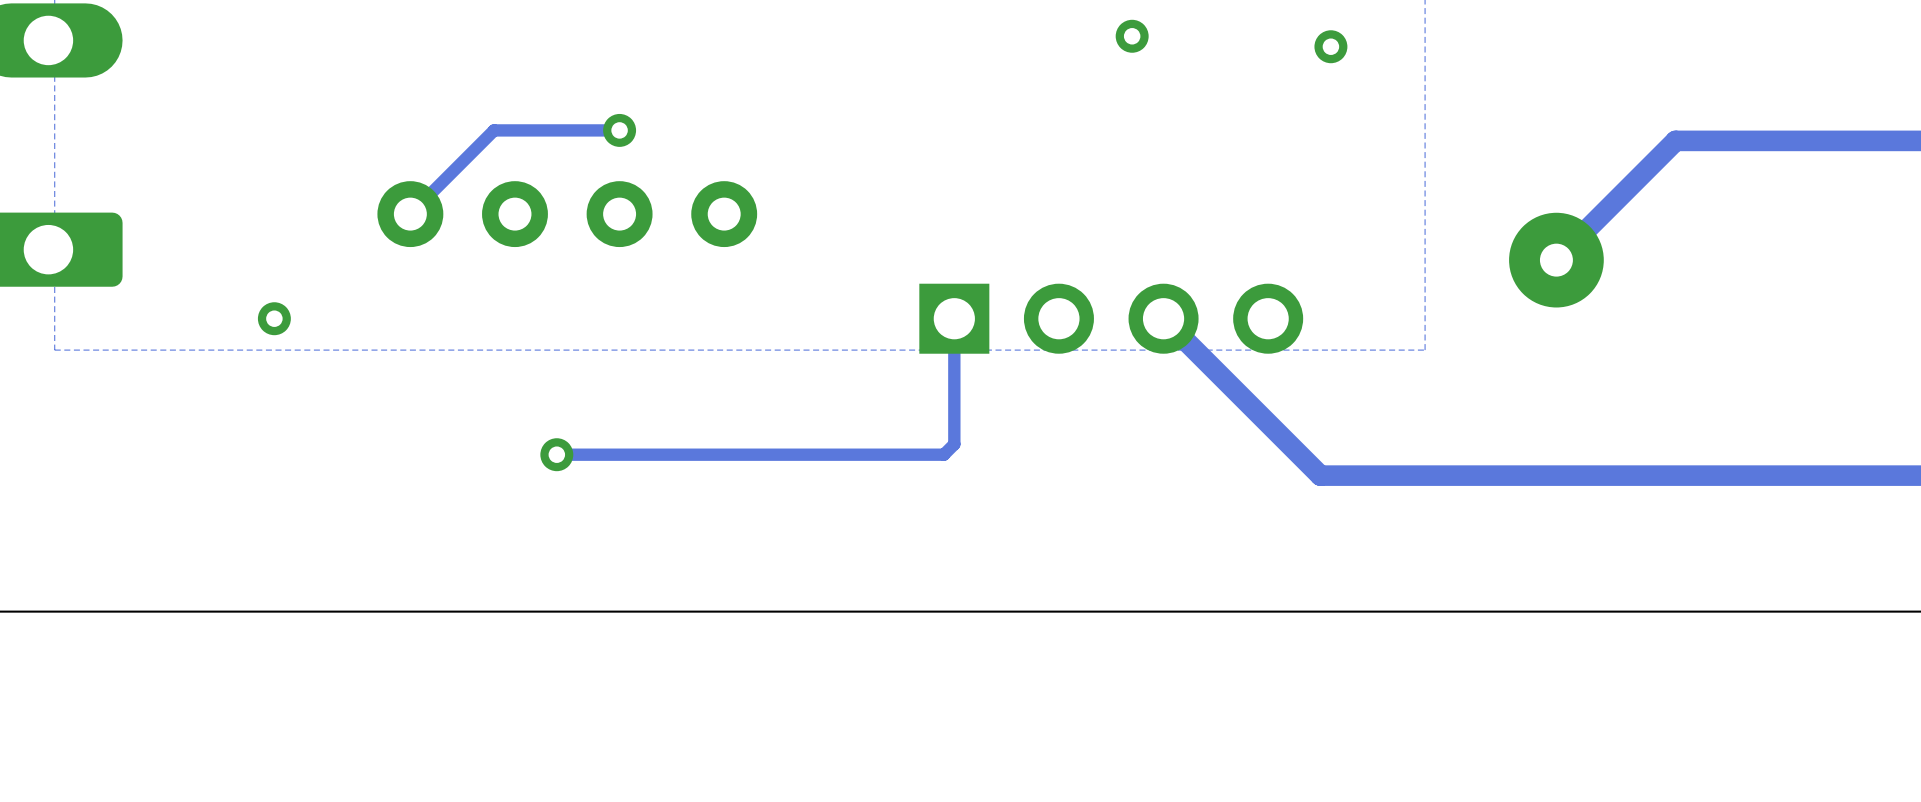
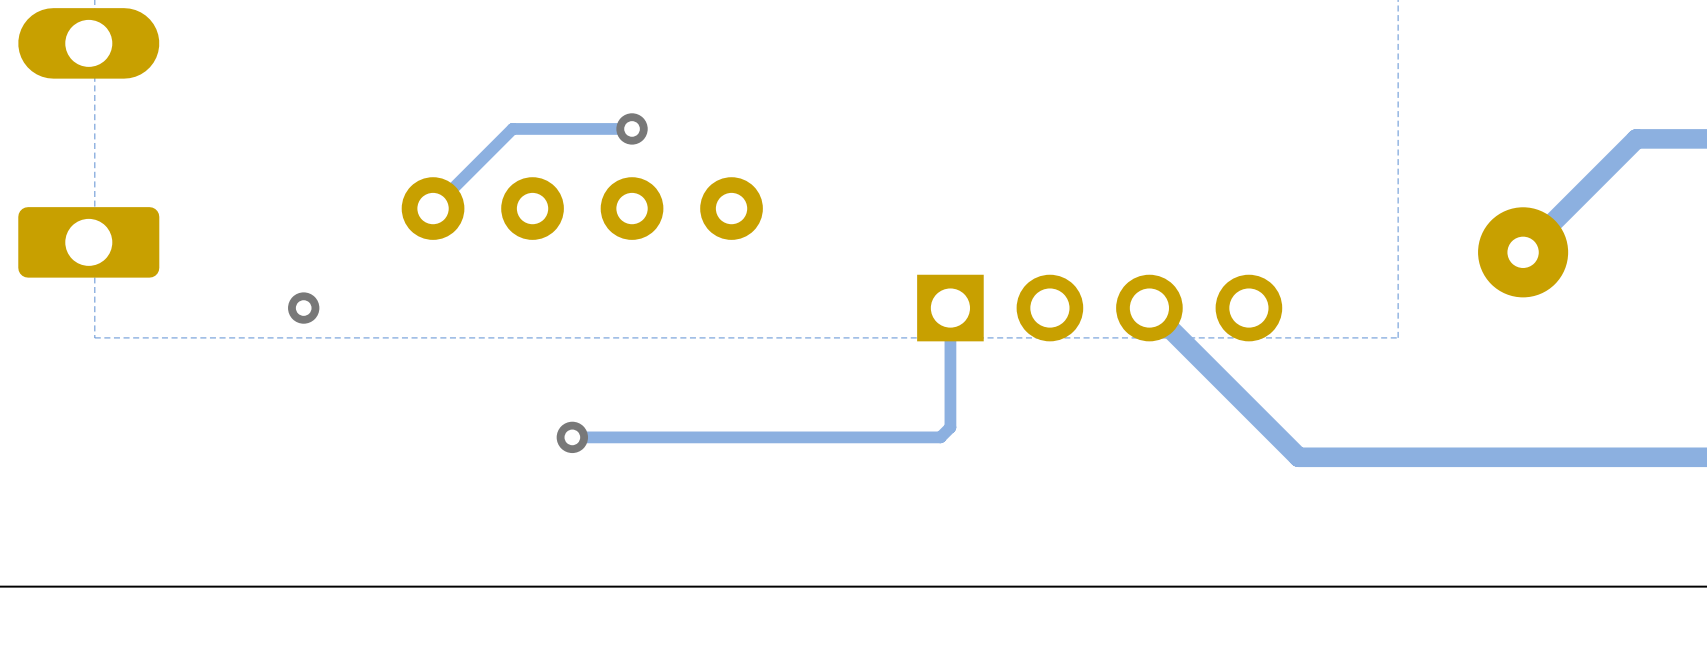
via: (1132, 36) -> none
via: (1330, 46) -> none

